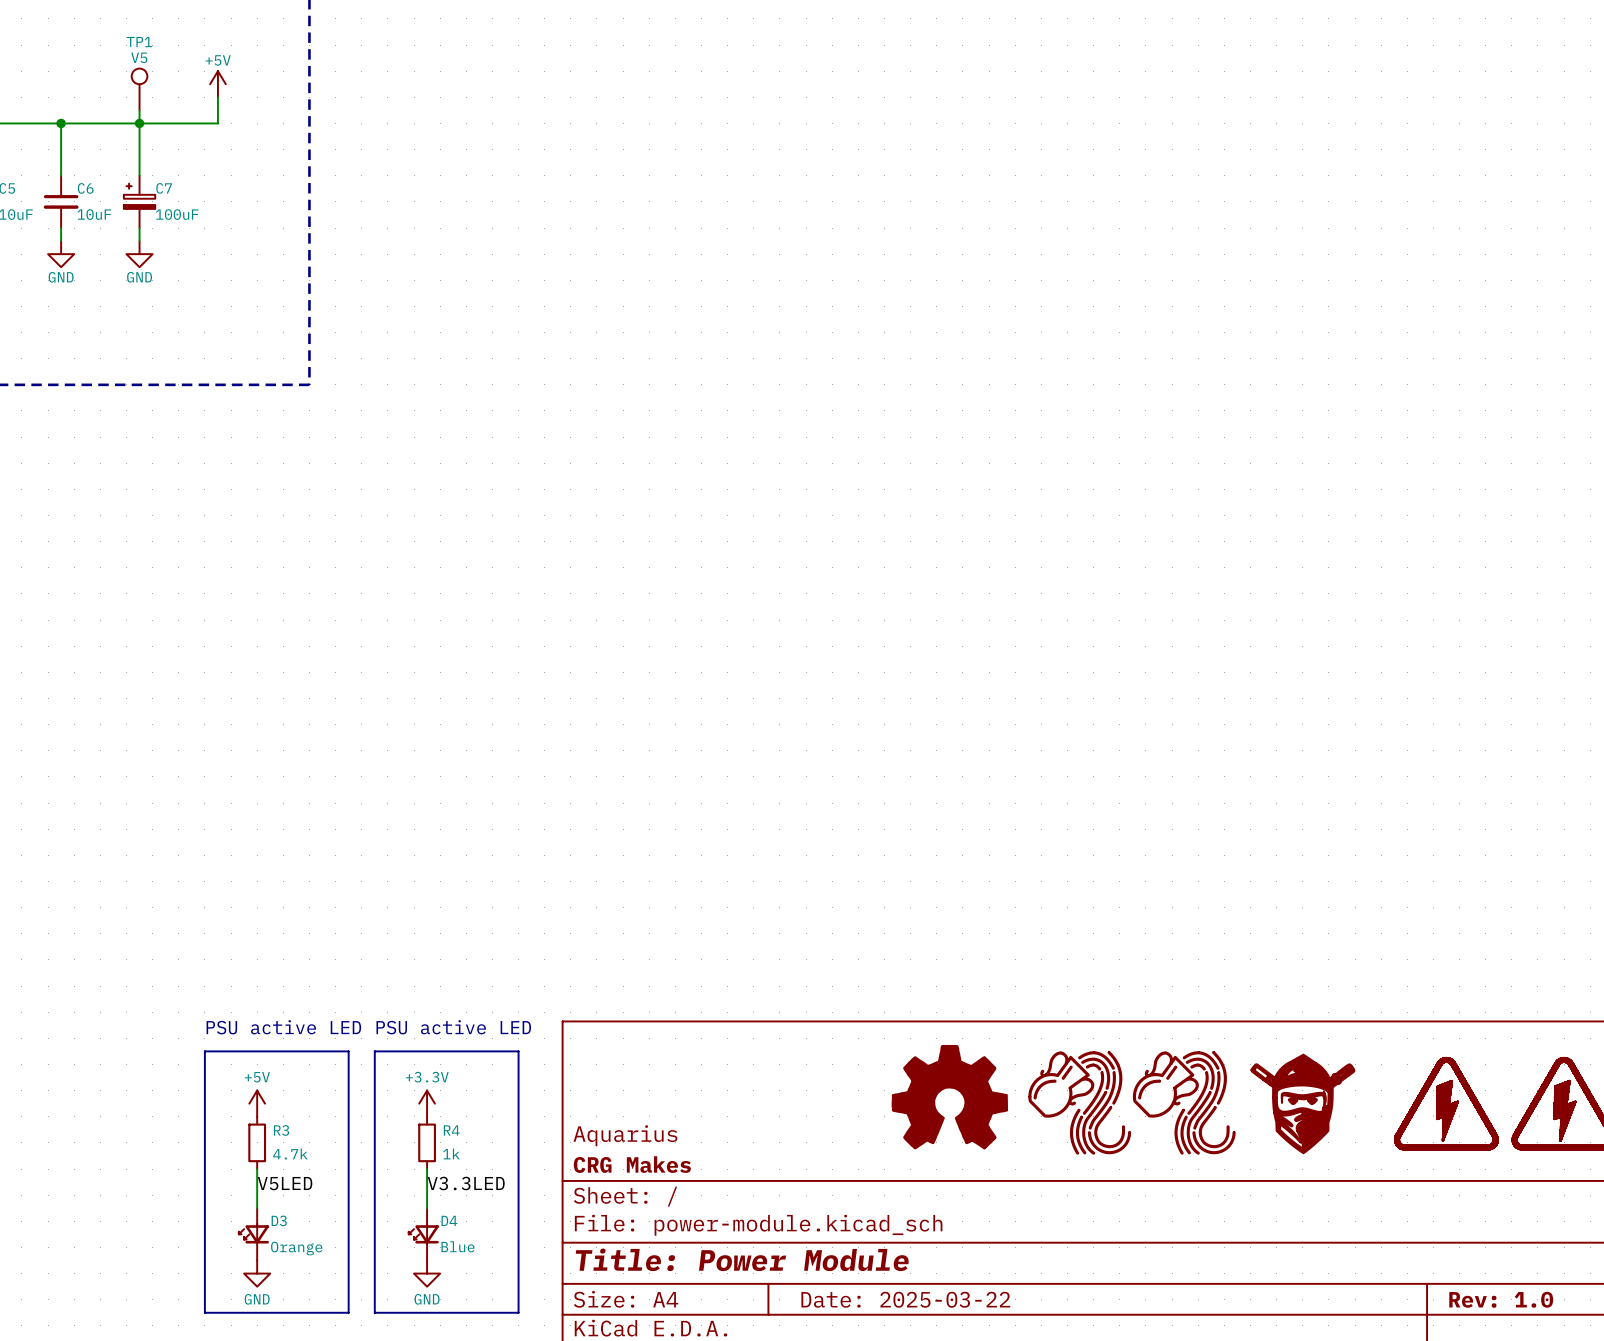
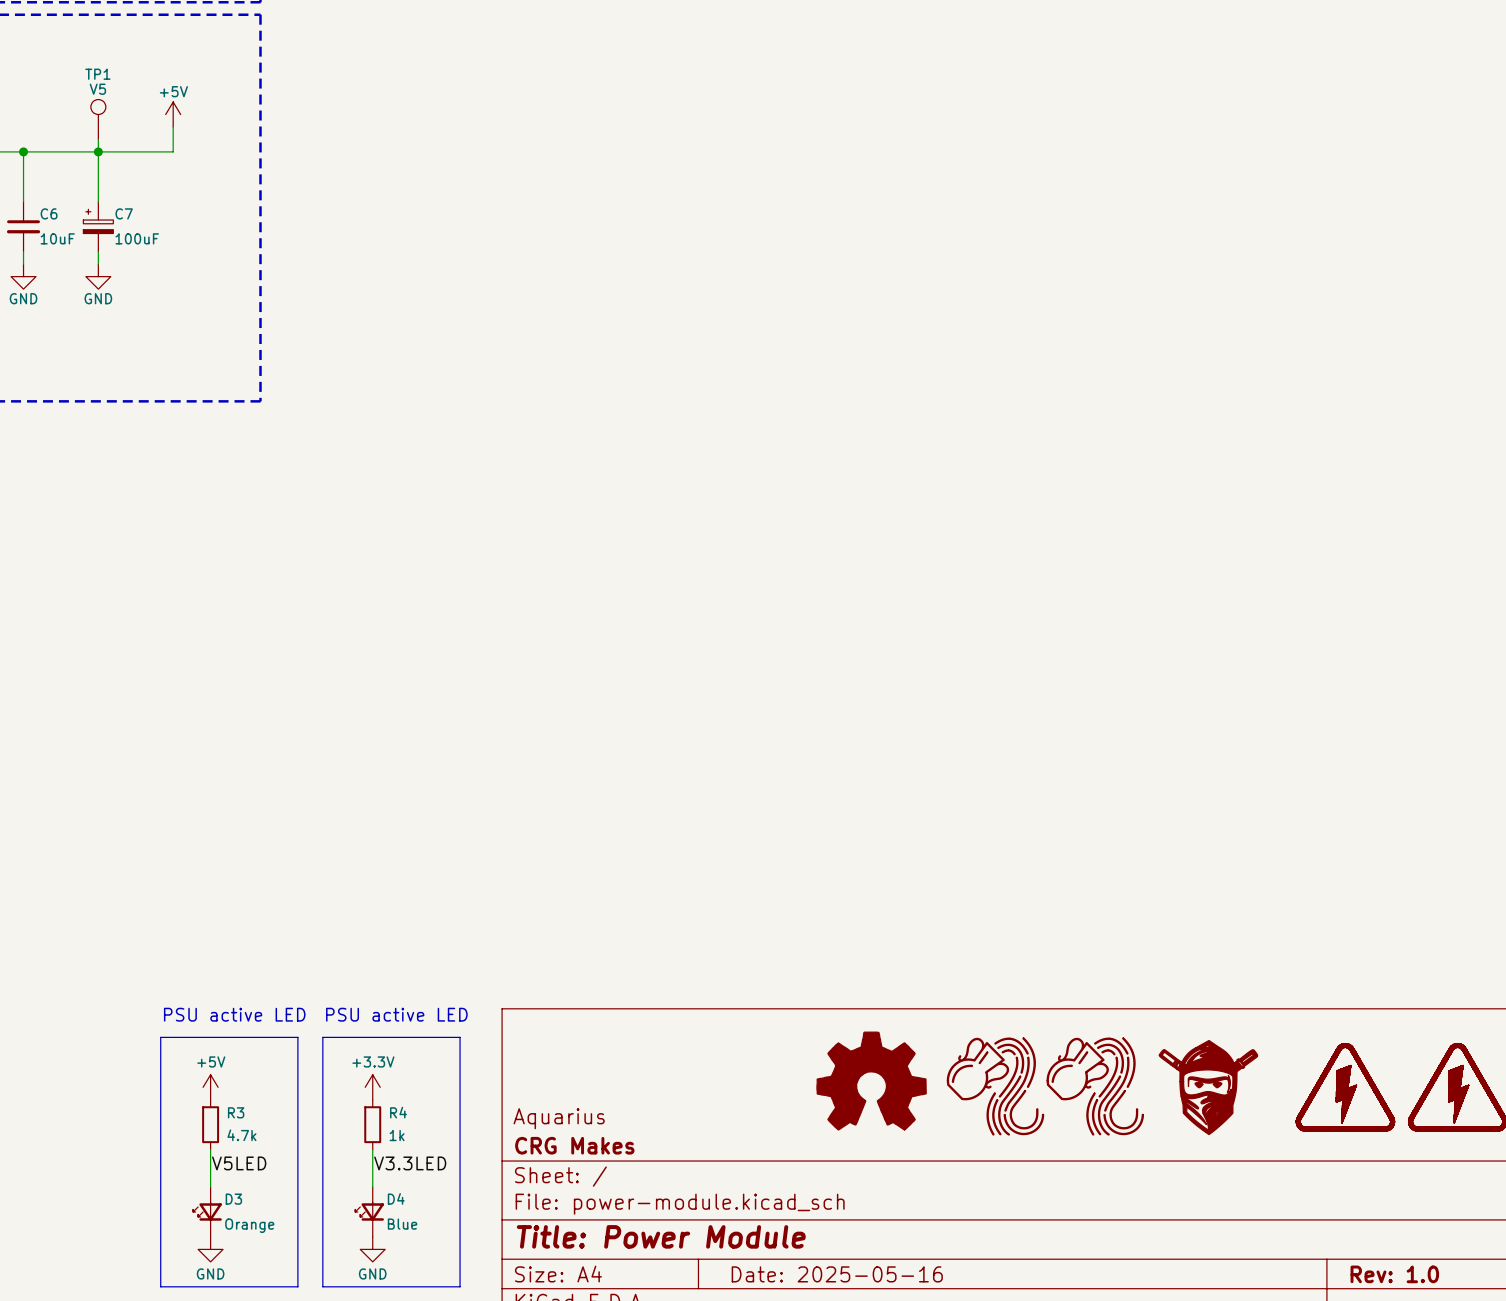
title block: Date: 2025-03-22 (905, 1299) -> Date: 2025-05-16 (837, 1274)

